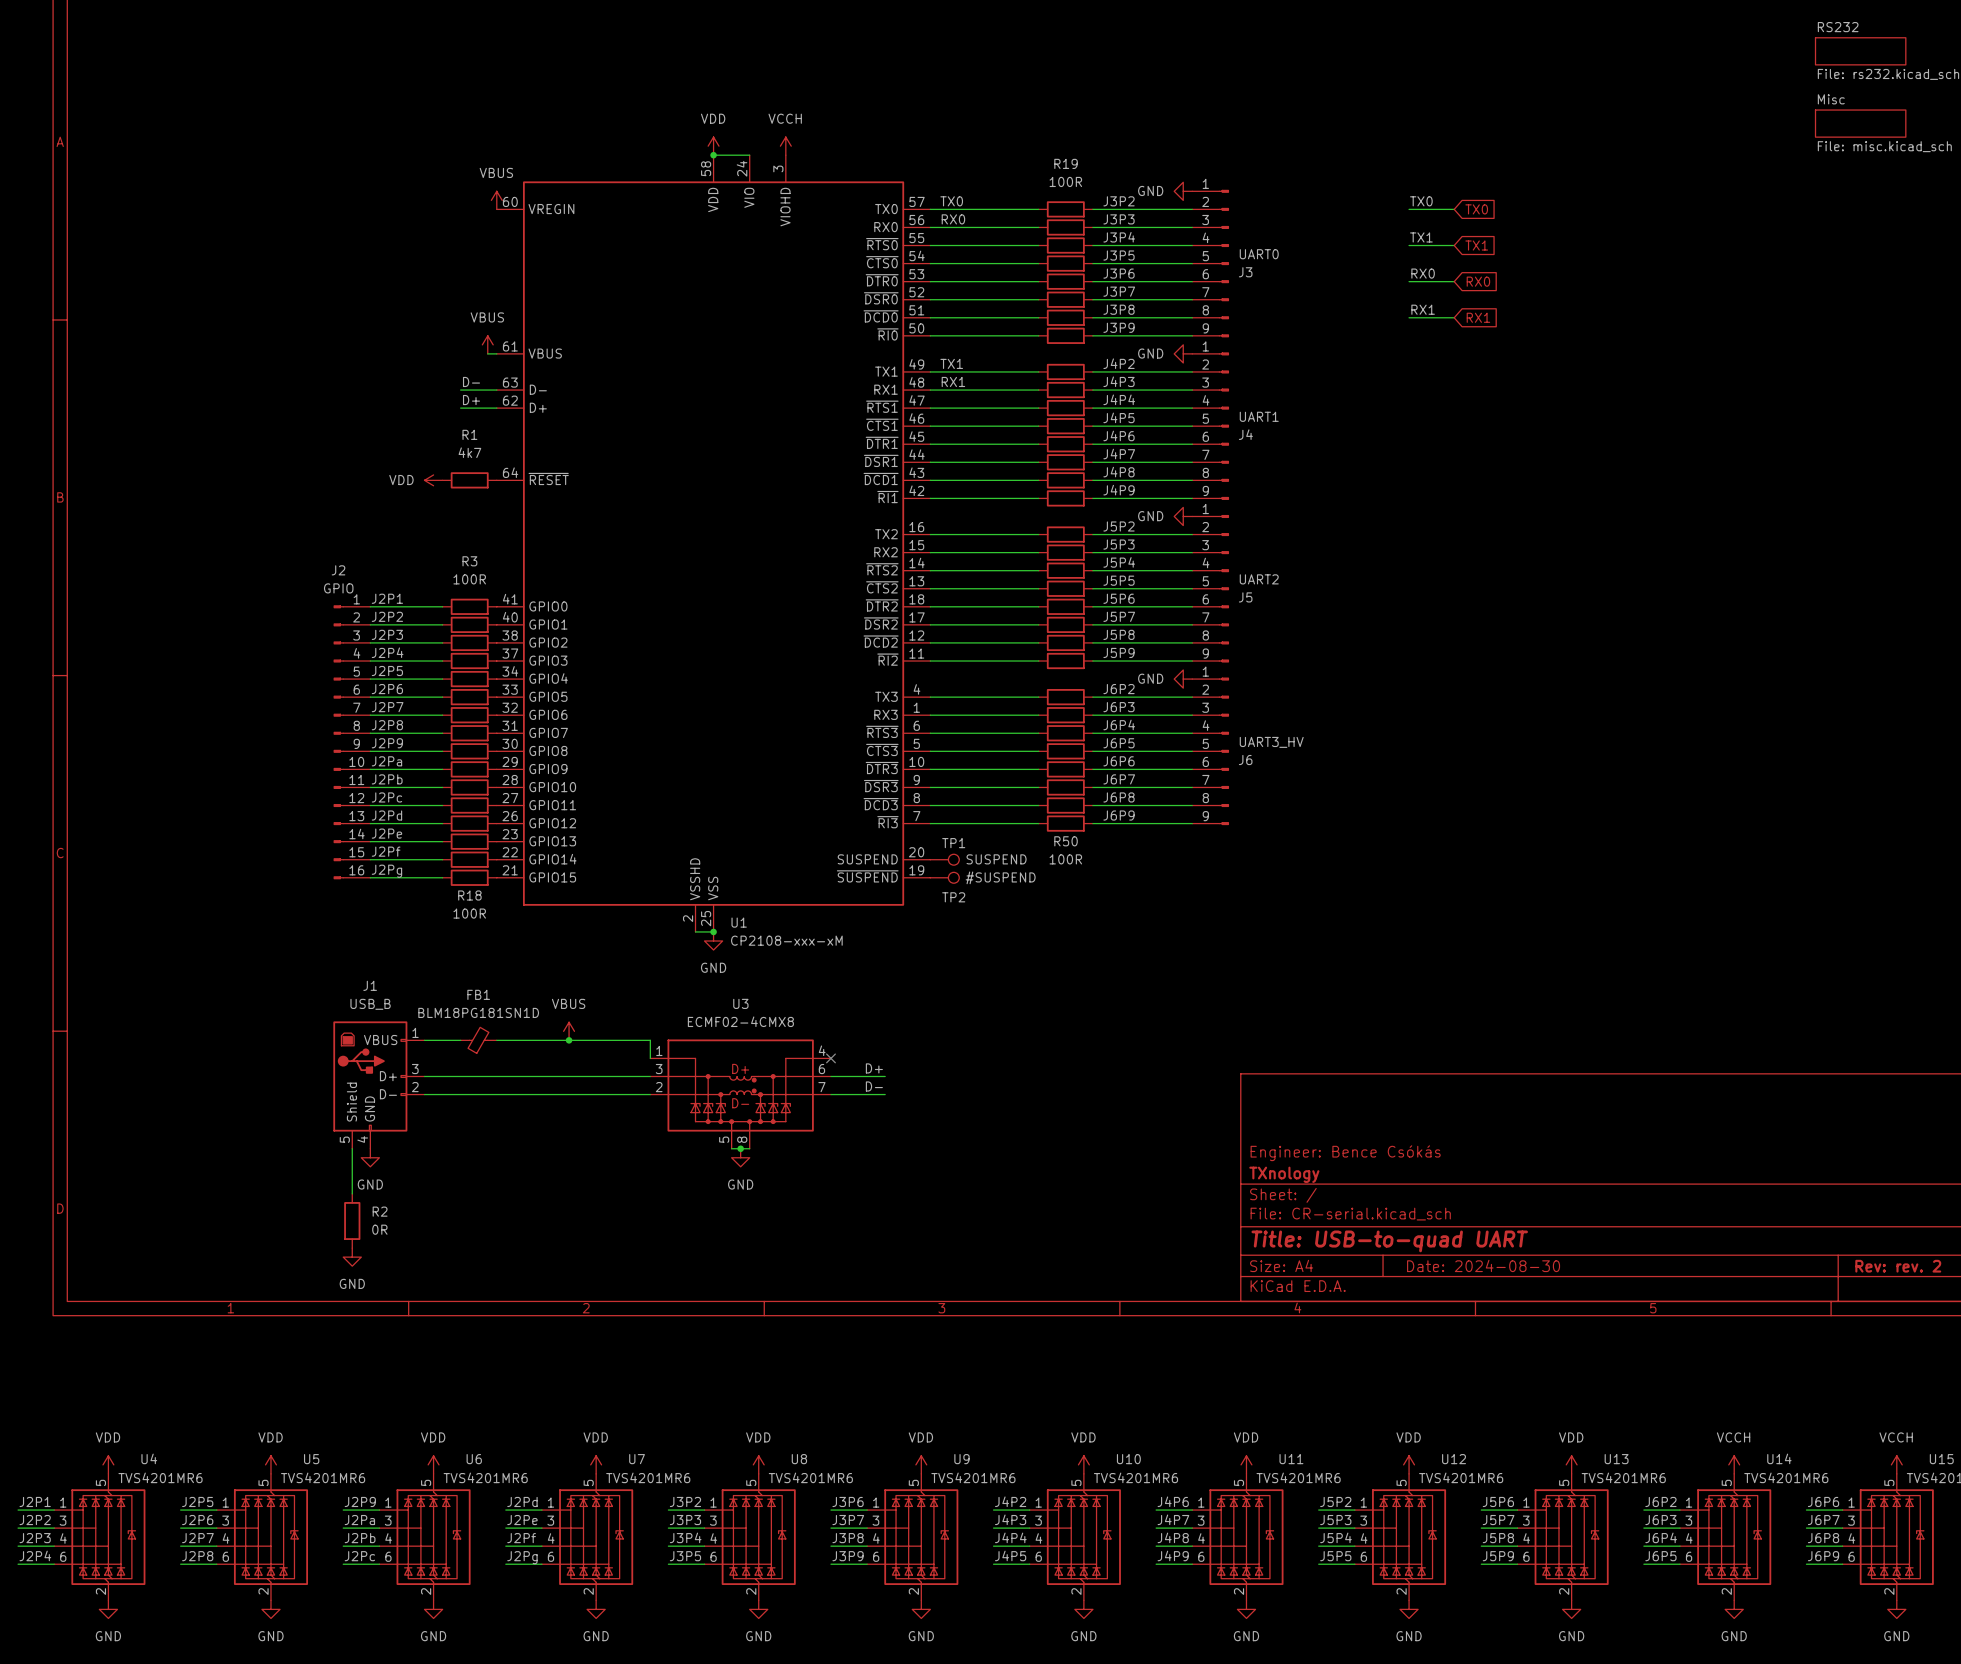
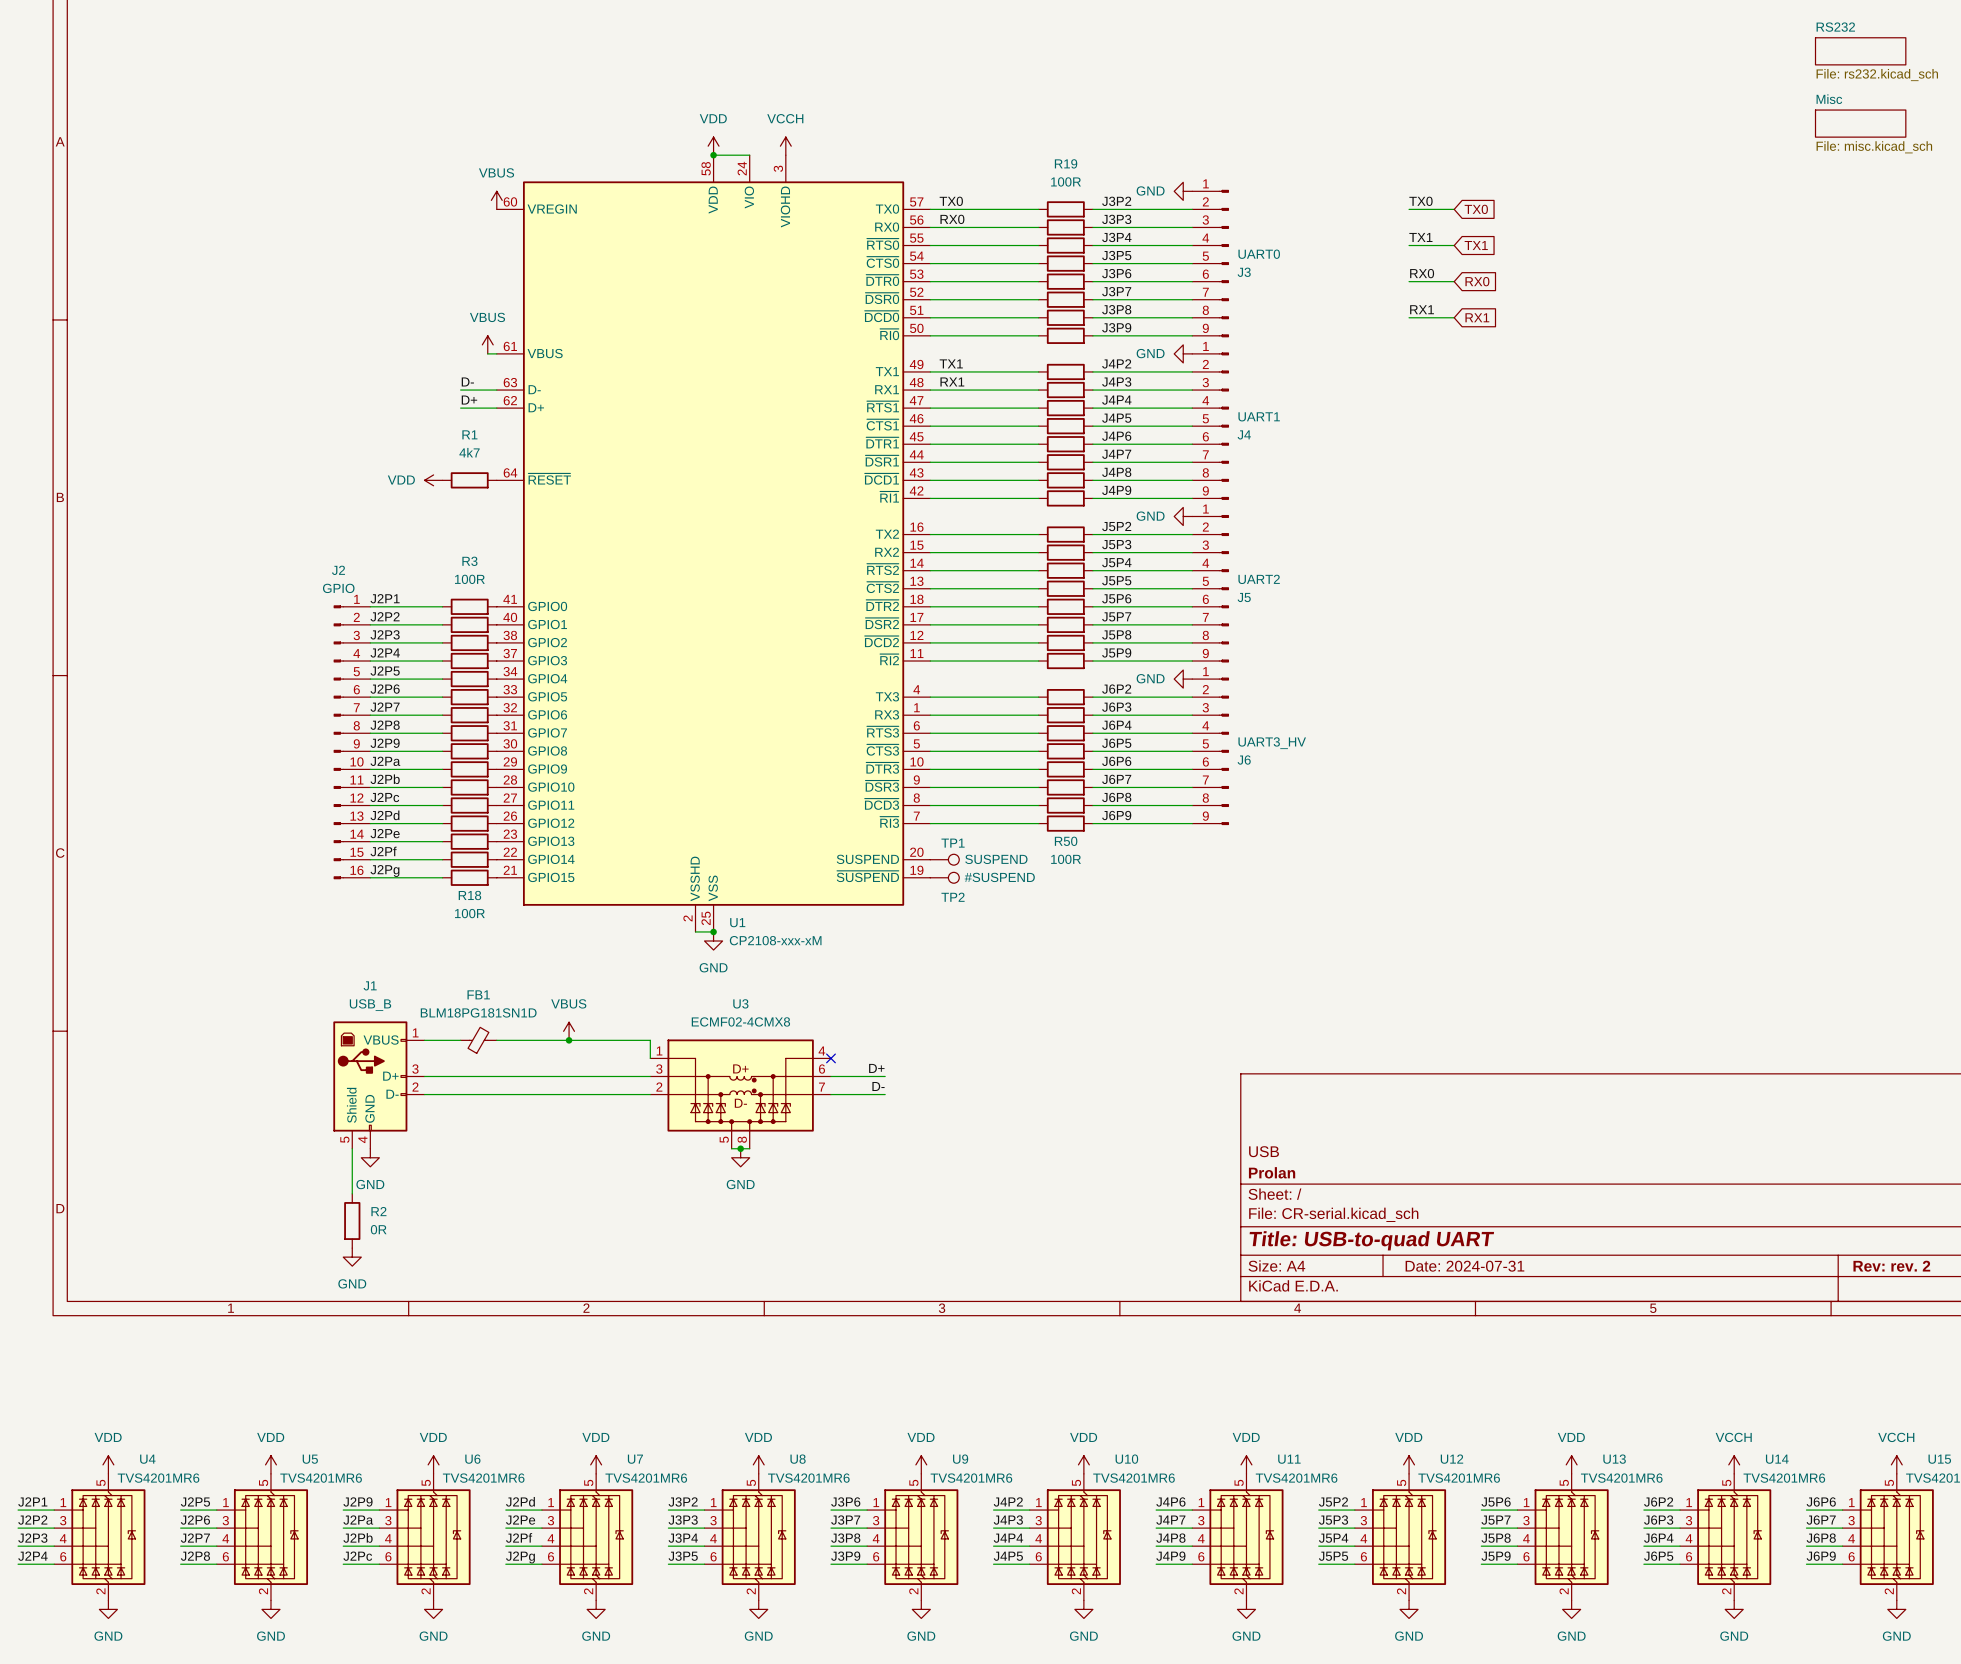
title block: Engineer: Bence Csókás (1345, 1153) -> USB (1264, 1151)
title block: TXnology (1284, 1174) -> Prolan (1272, 1172)
title block: Date: 2024-08-30 (1483, 1265) -> Date: 2024-07-31 (1464, 1266)

